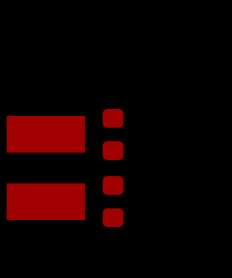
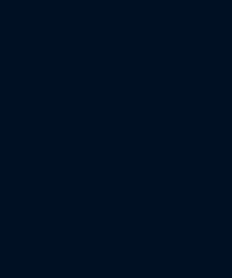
part: (113, 134) -> none
part: (45, 168) -> none
part: (113, 201) -> none

